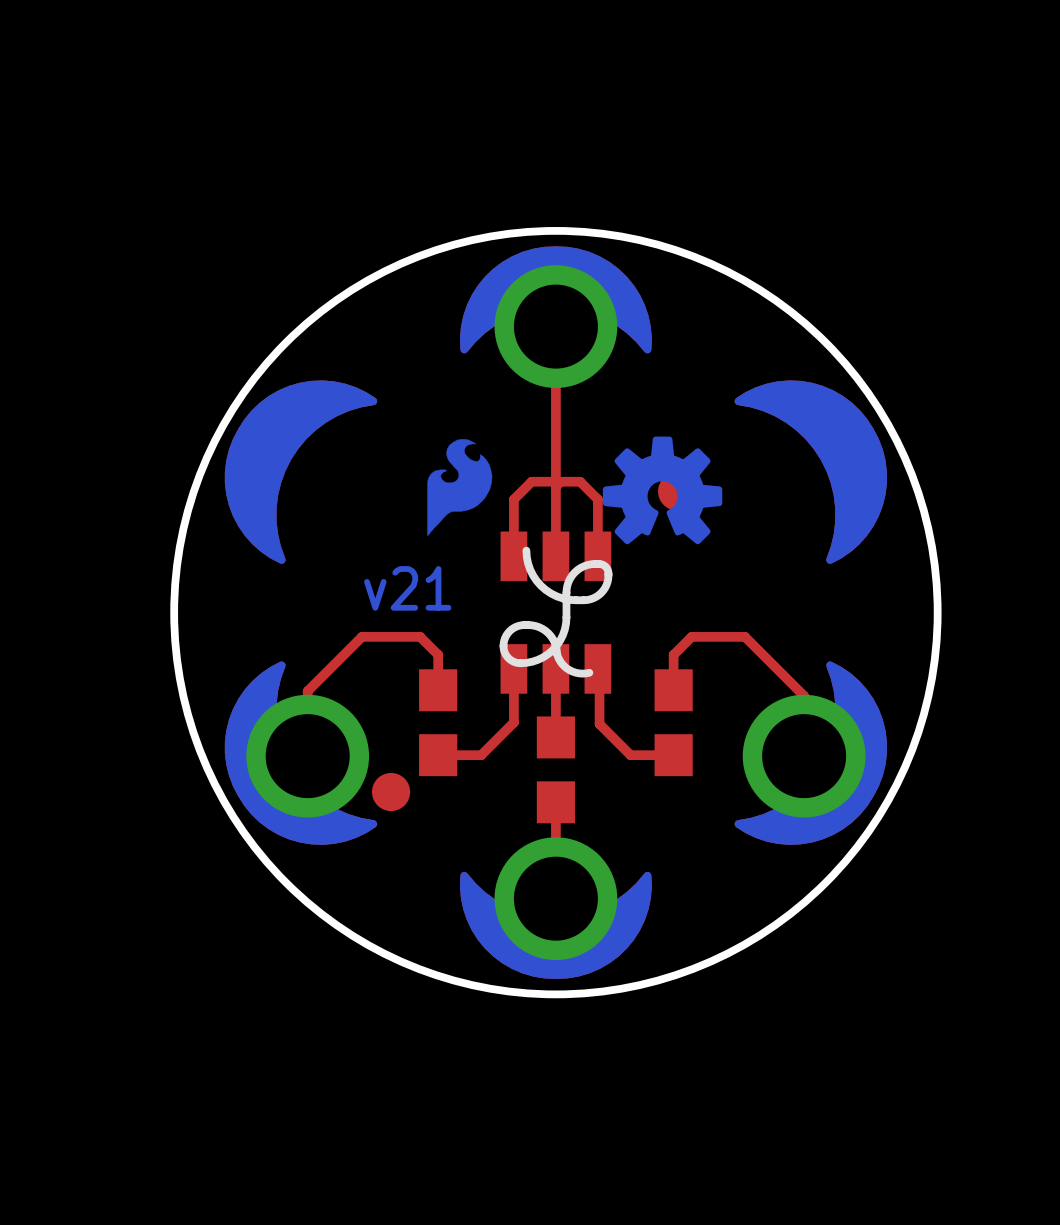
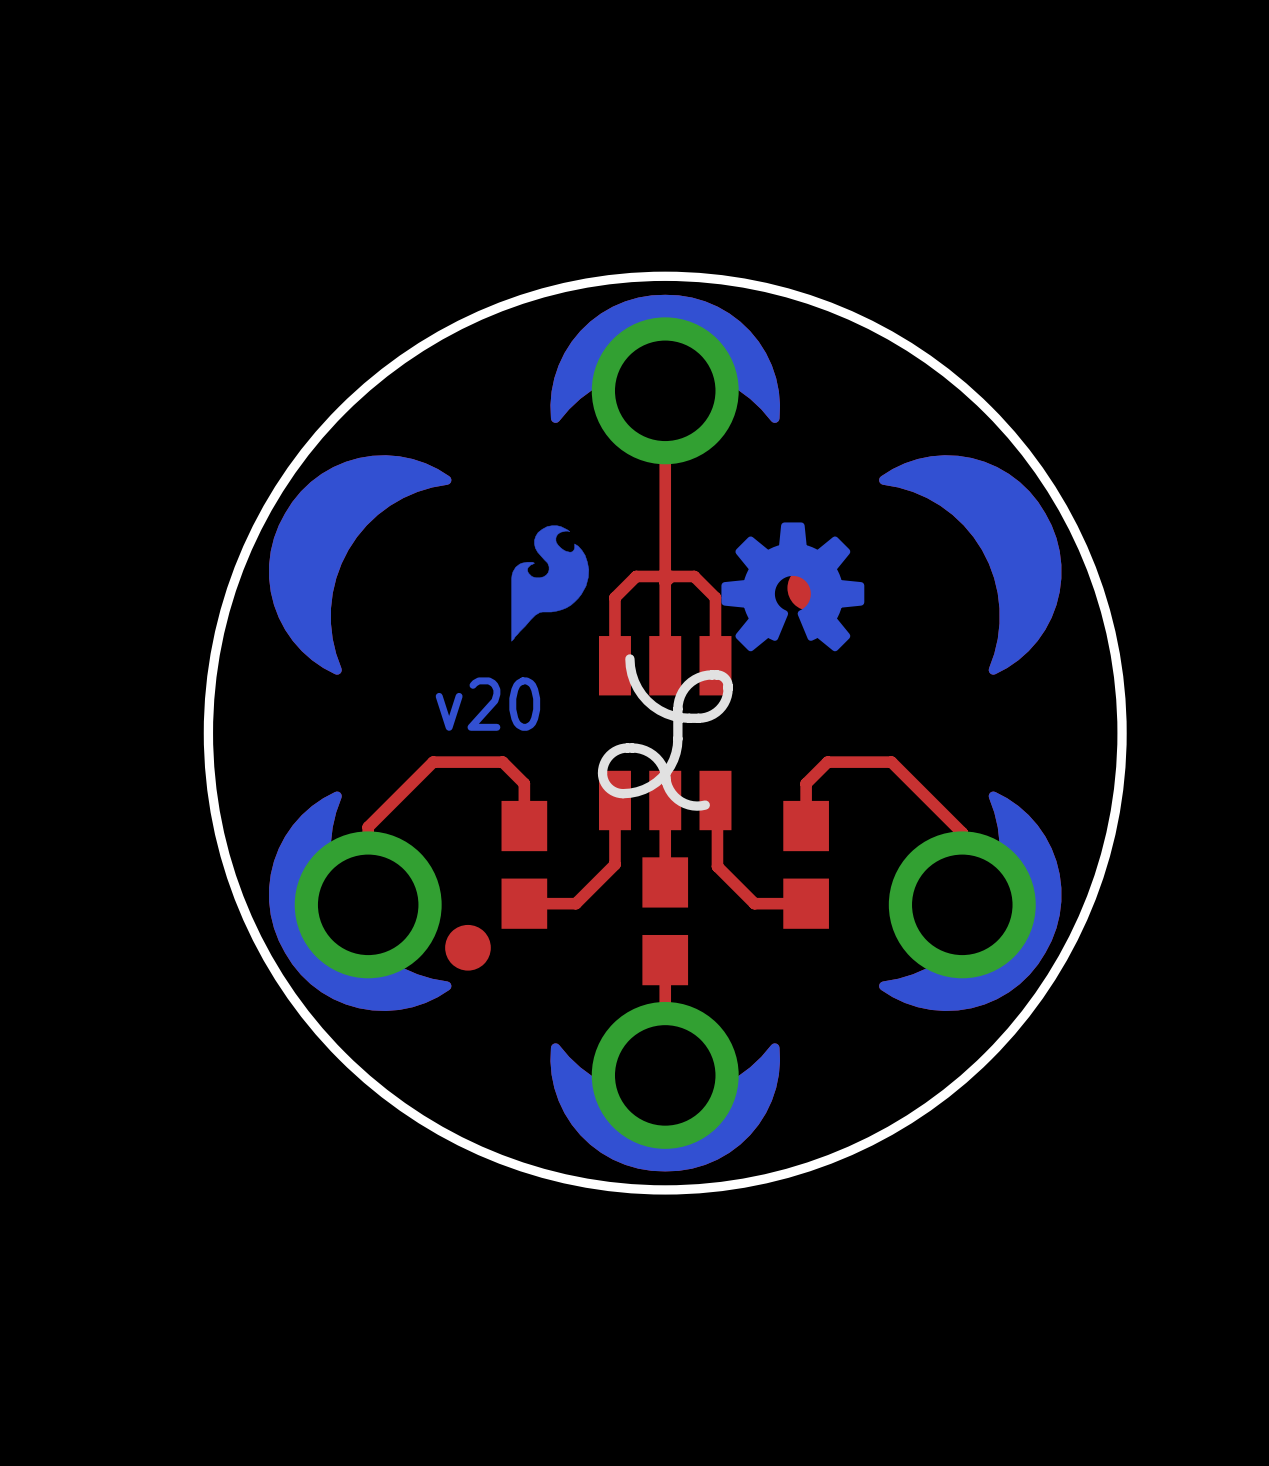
text: v21 (407, 588) -> v20 (487, 704)

